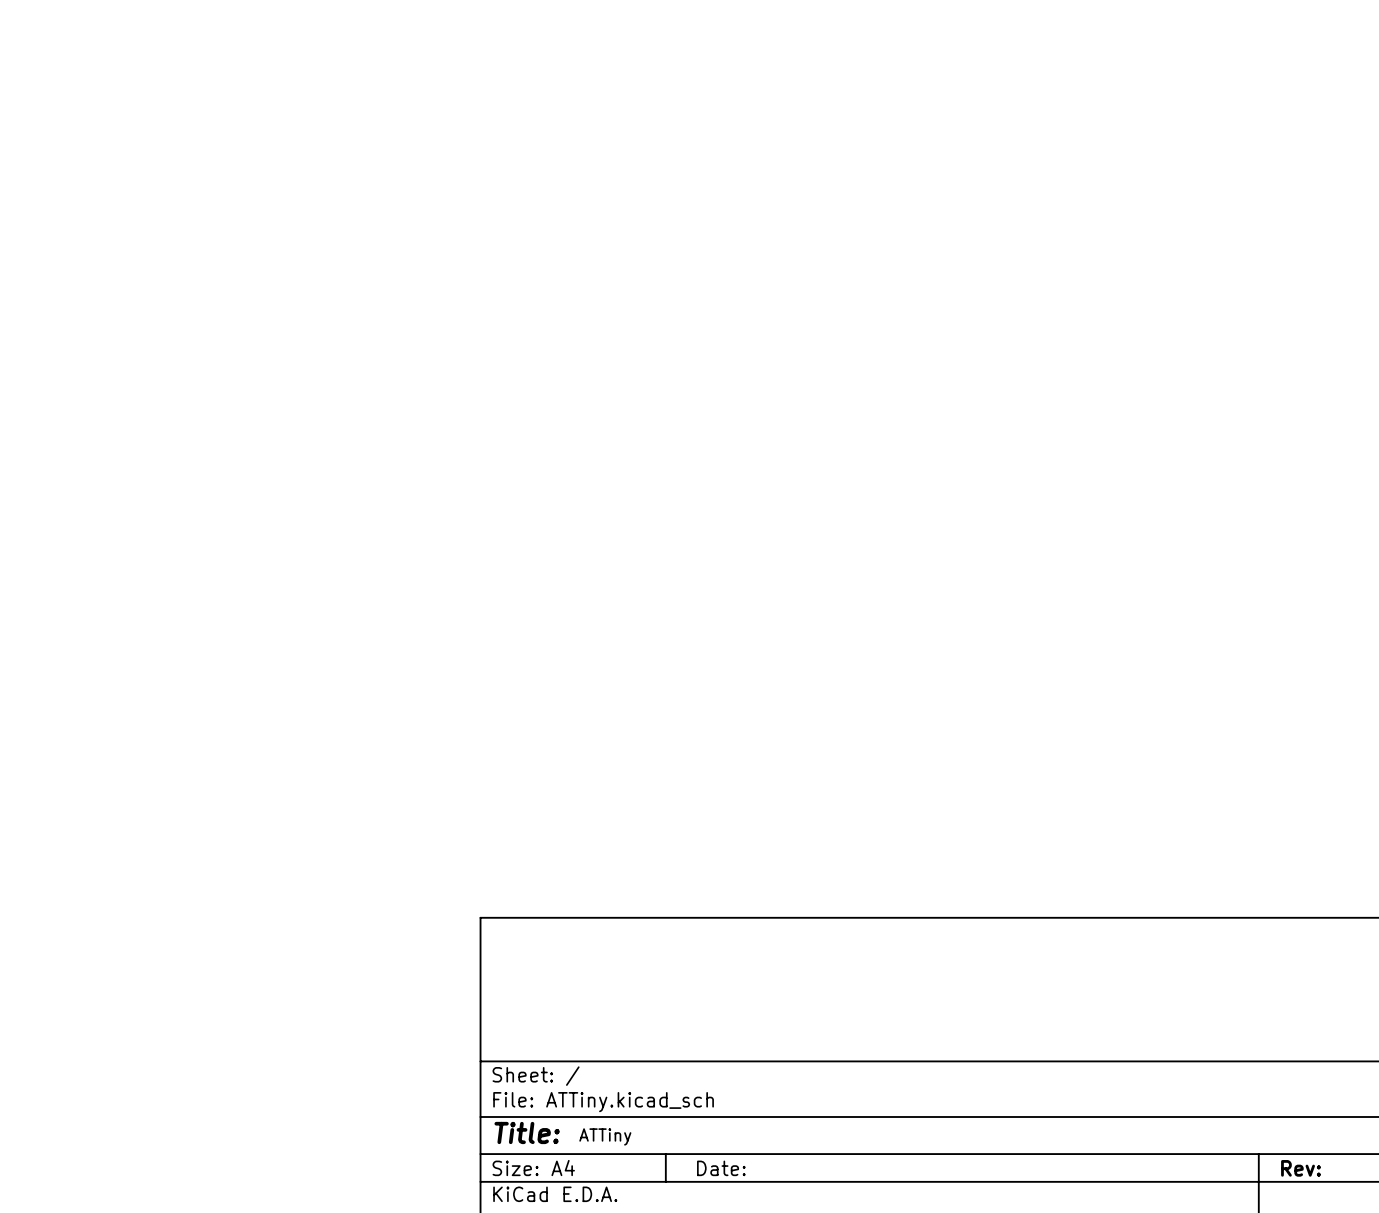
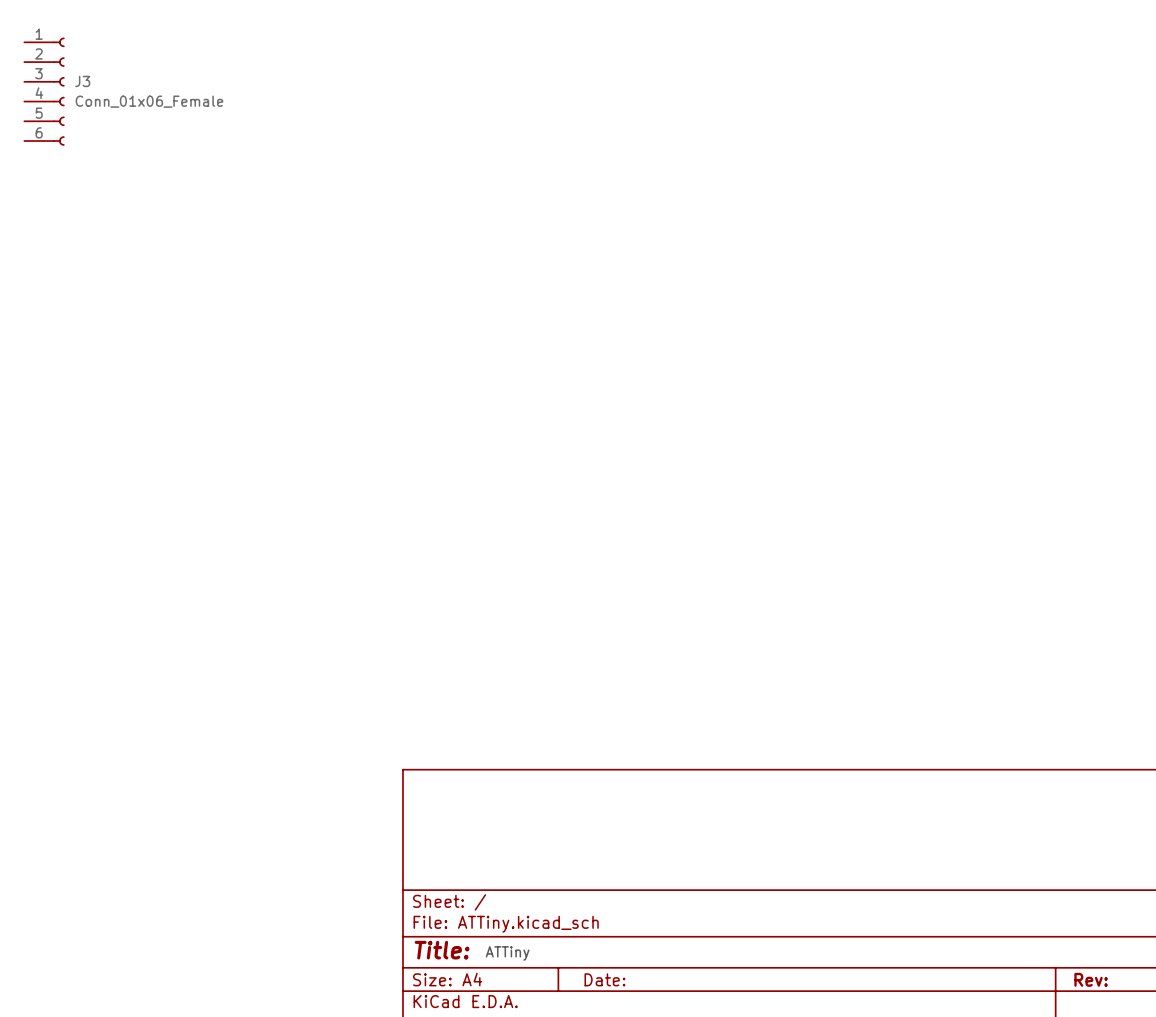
J3: none -> Conn_01x06_Female (44, 91)

